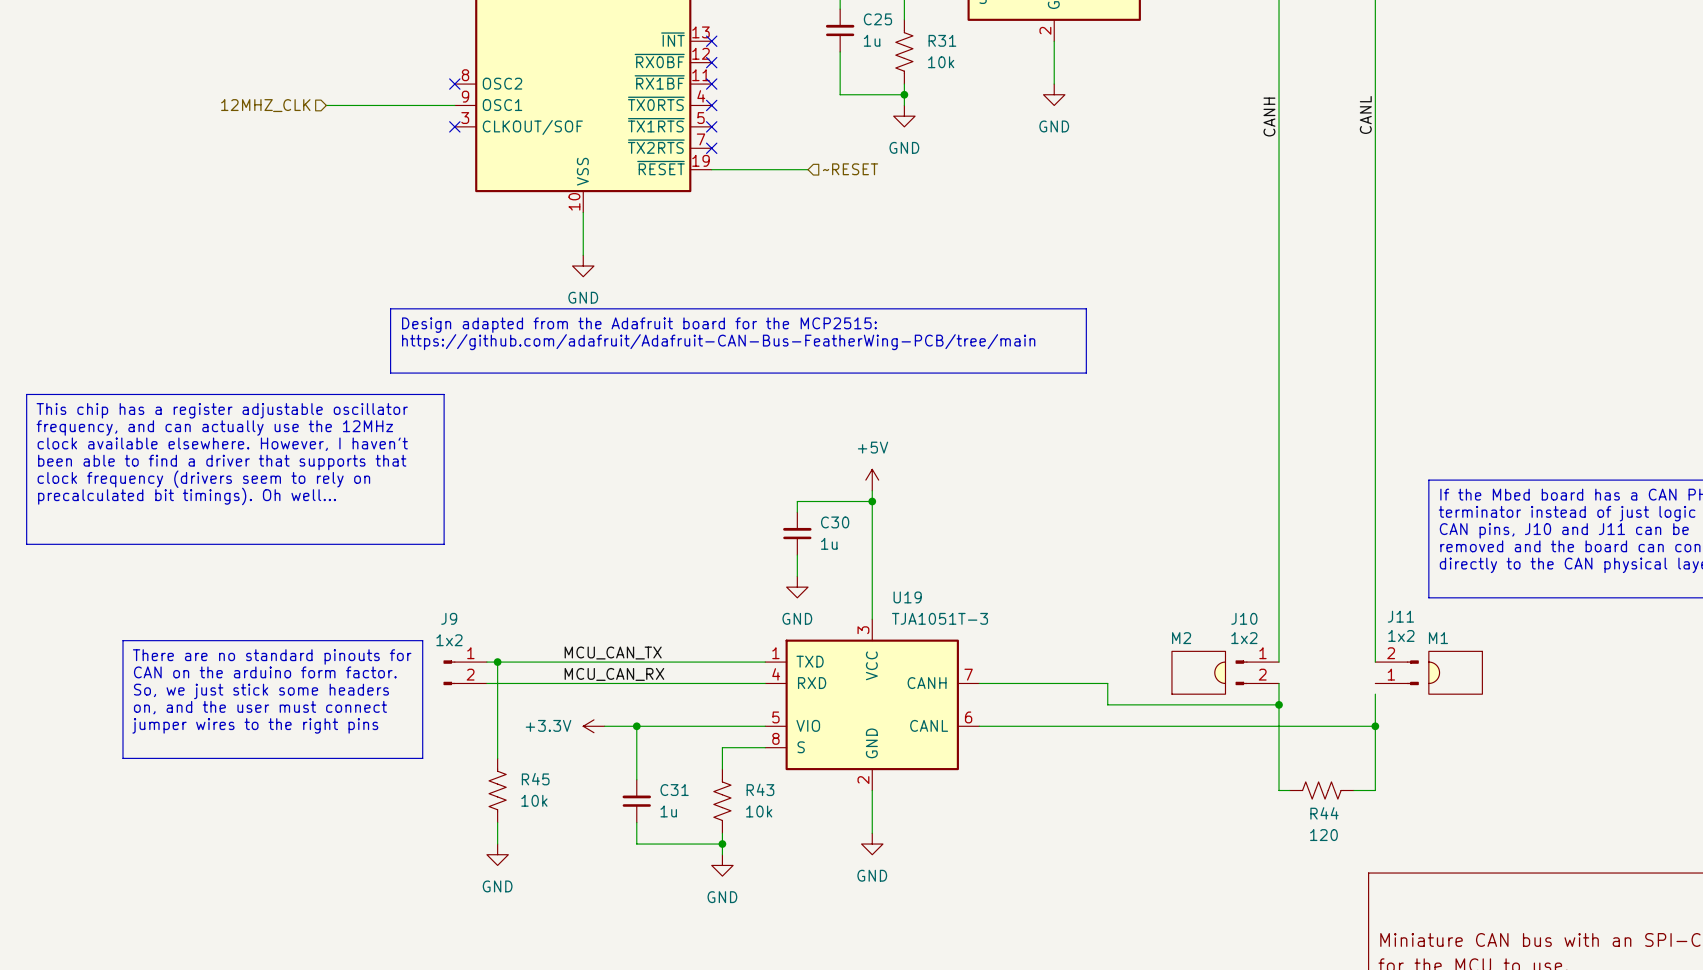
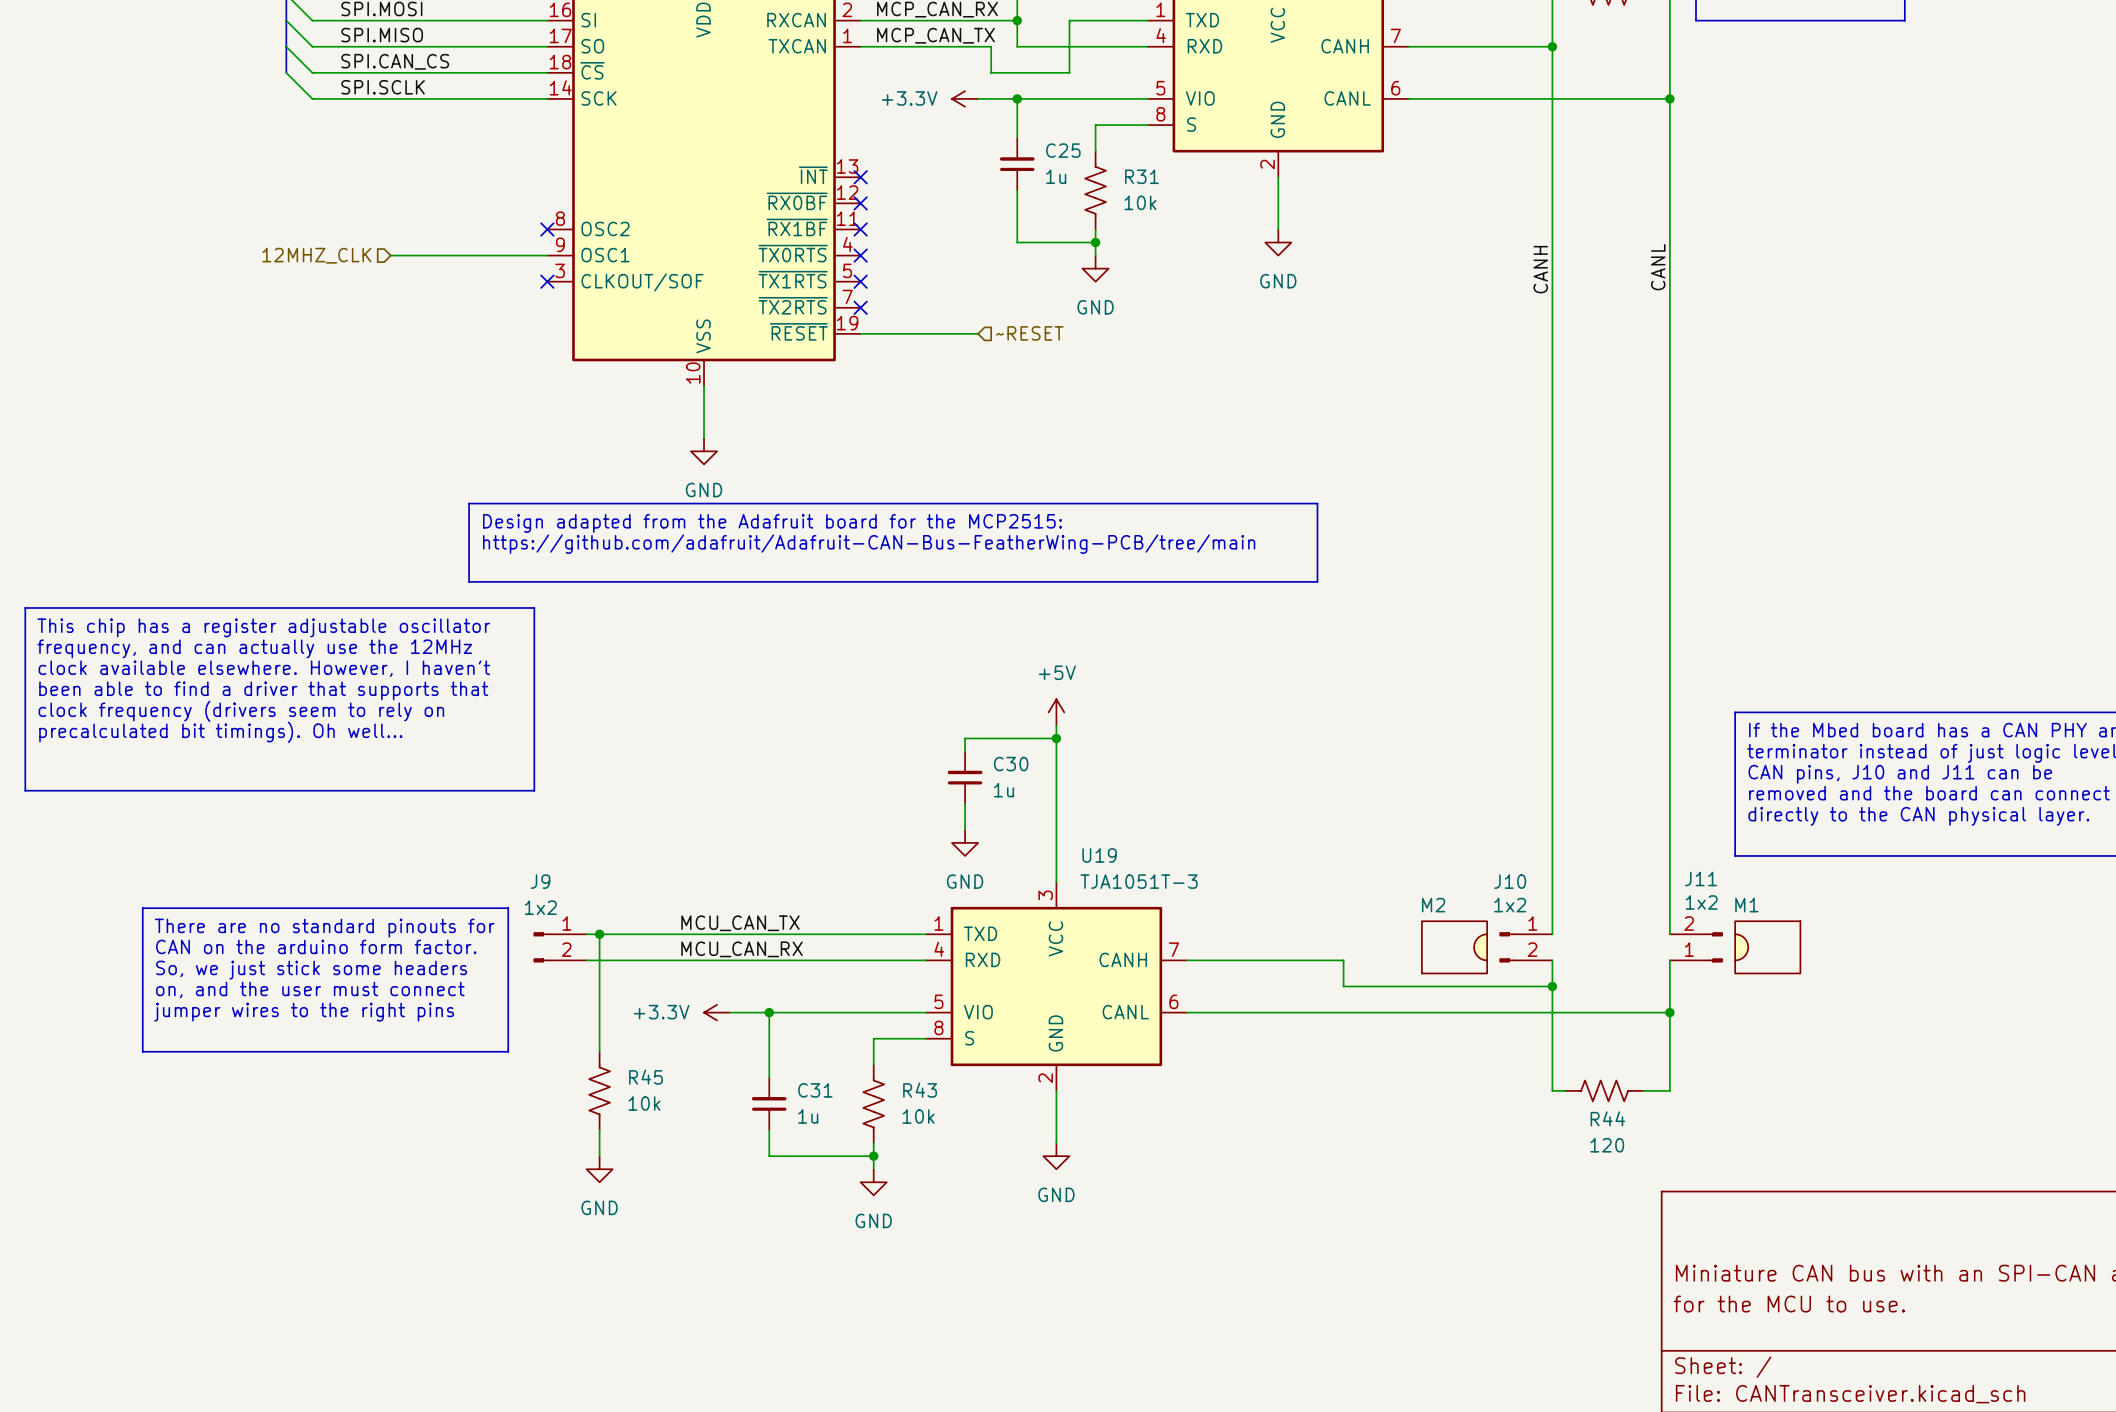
wire: none -> (1669, 960) (1669, 973)

